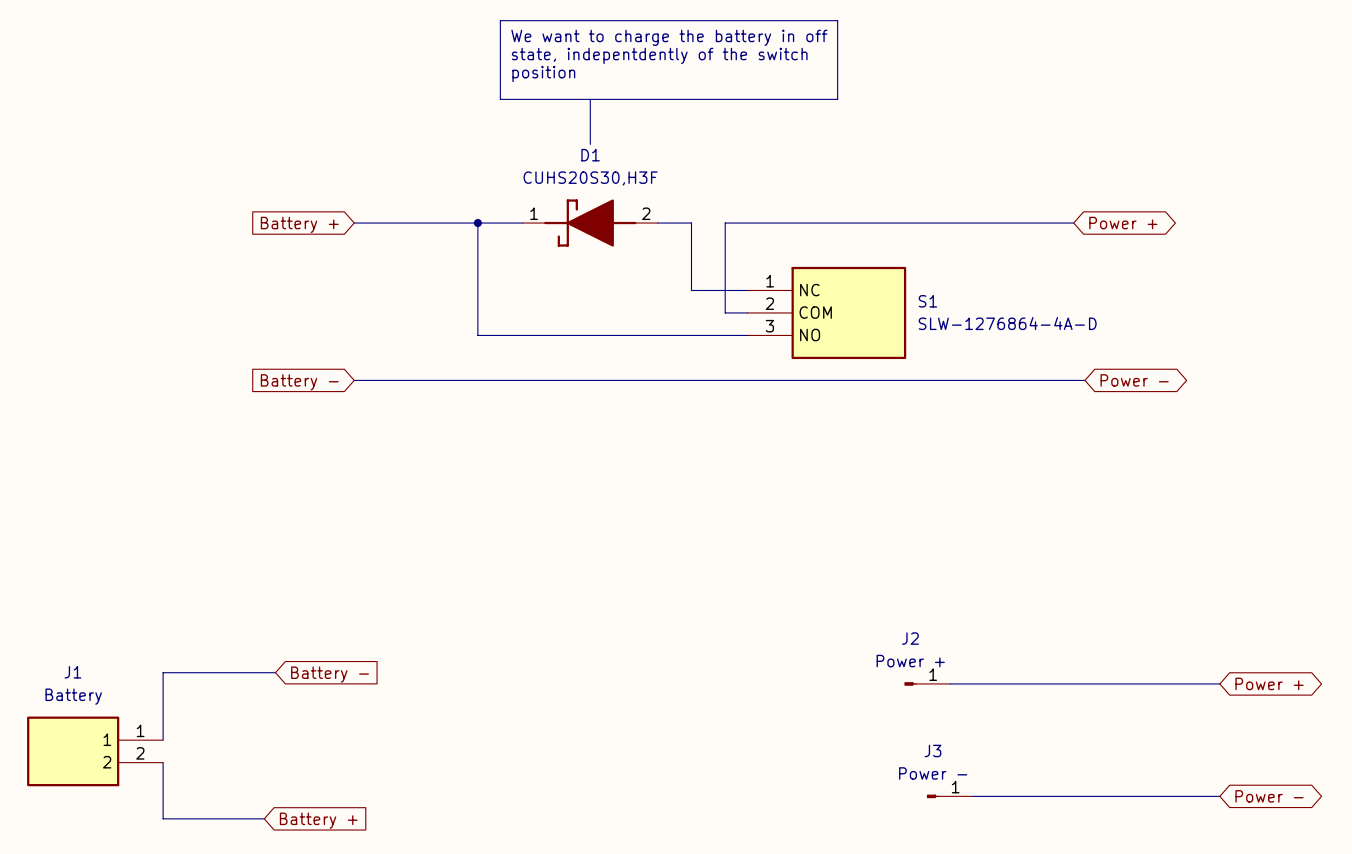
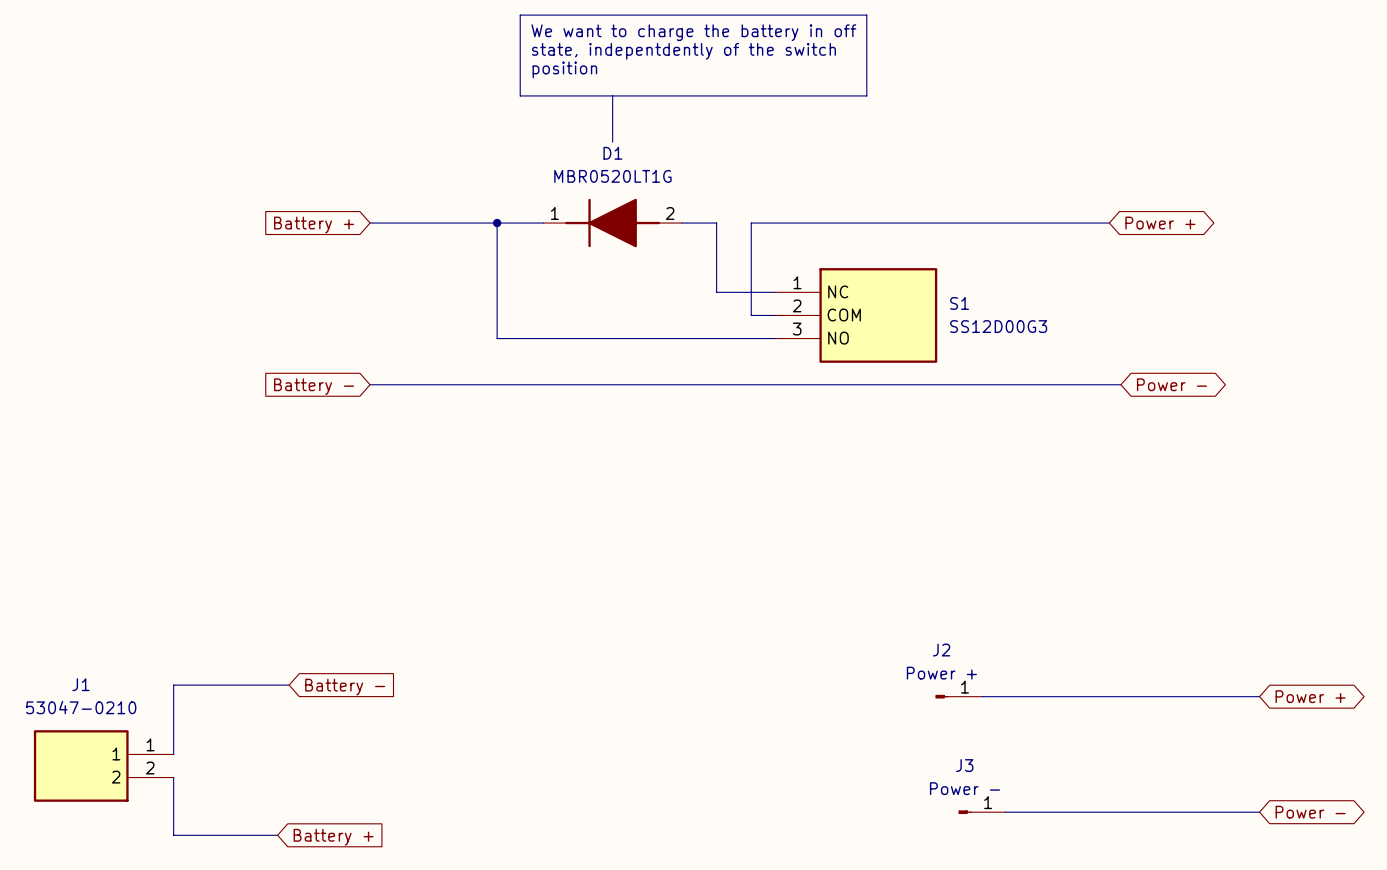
D1 value: CUHS20S30,H3F (590, 178) -> MBR0520LT1G (612, 176)
D1 symbol: [522, 199, 658, 247] -> [543, 198, 682, 248]
S1 value: SLW-1276864-4A-D (1007, 323) -> SS12D00G3 (998, 326)
J1 value: Battery (73, 696) -> 53047-0210 (81, 707)

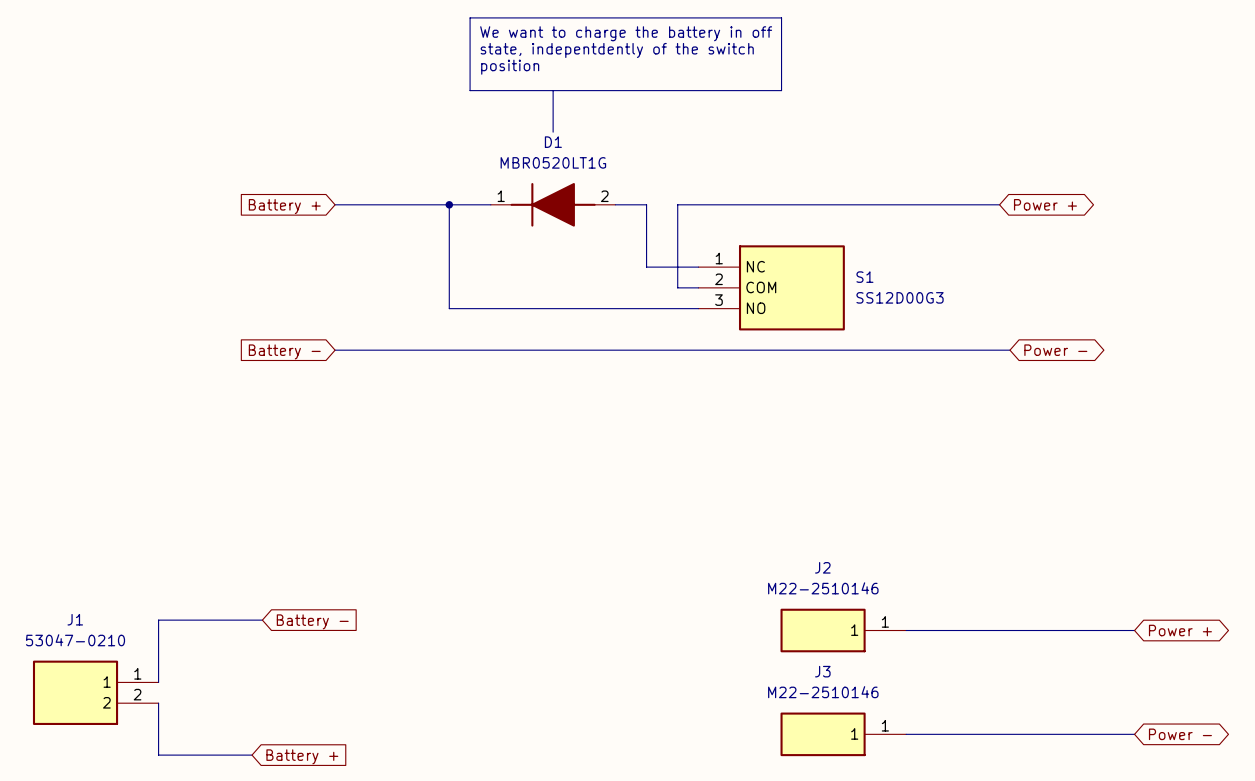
J2 name position: J2 (941, 650) -> J2 (822, 567)
J2 value: Power + (941, 673) -> M22-2510146 (823, 588)
J2 symbol: [935, 694, 983, 699] -> [780, 608, 907, 653]
J3 name position: J3 (964, 765) -> J3 (822, 671)
J3 value: Power - (964, 788) -> M22-2510146 (823, 692)
J3 symbol: [958, 810, 1006, 815] -> [780, 712, 907, 757]

